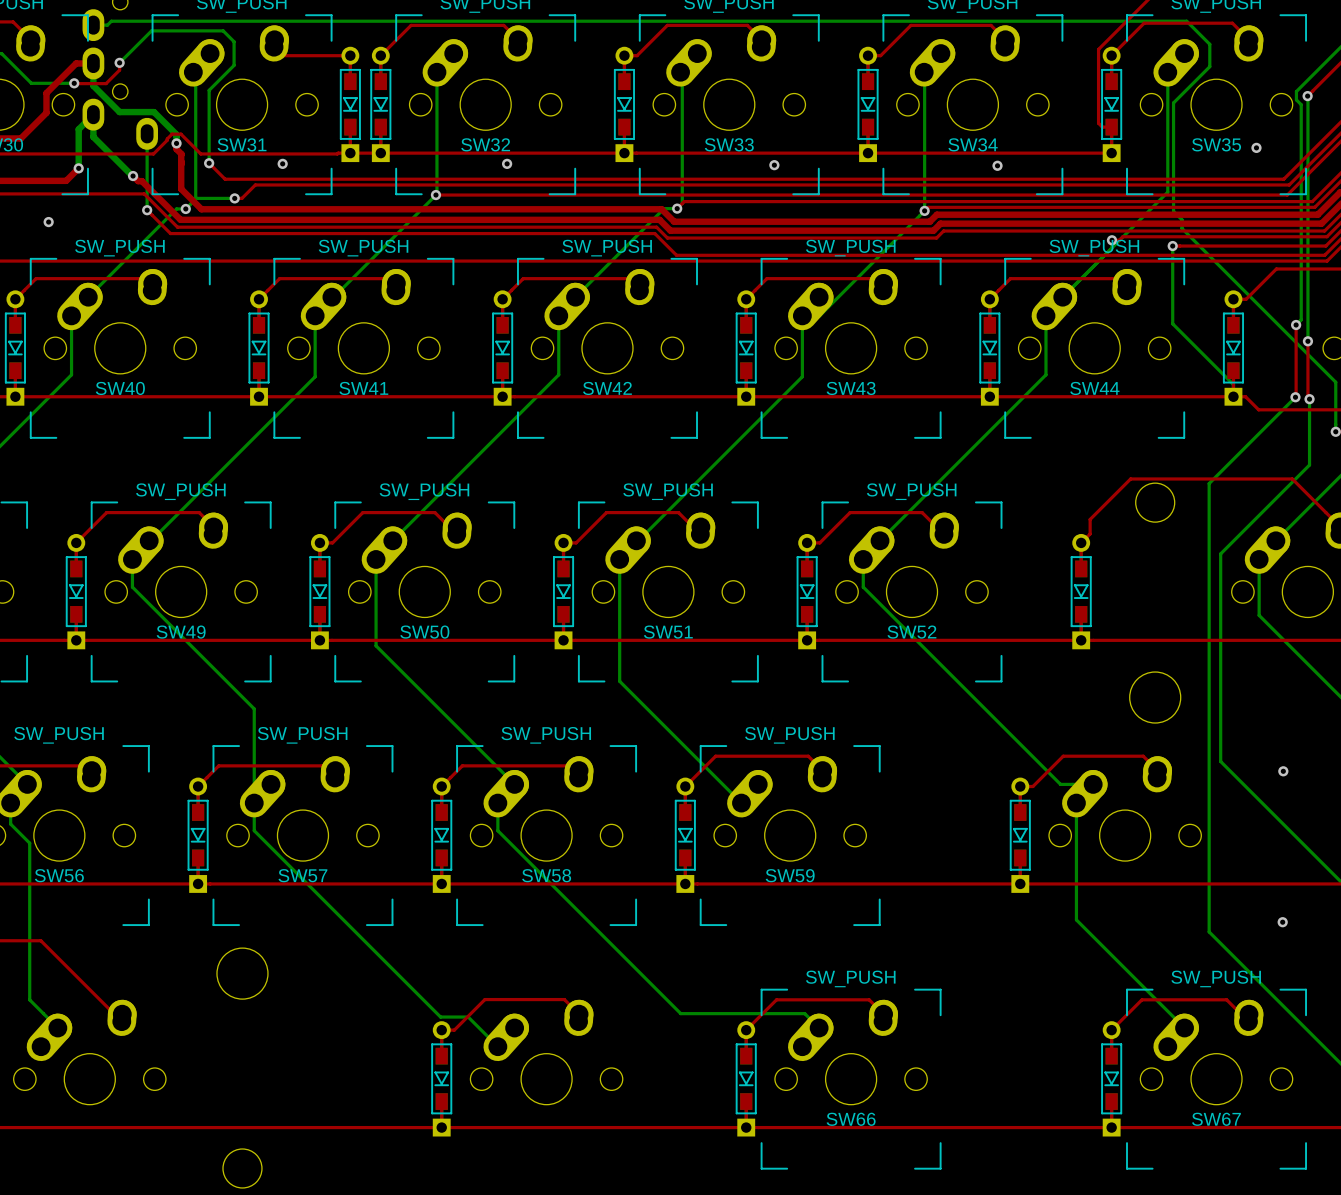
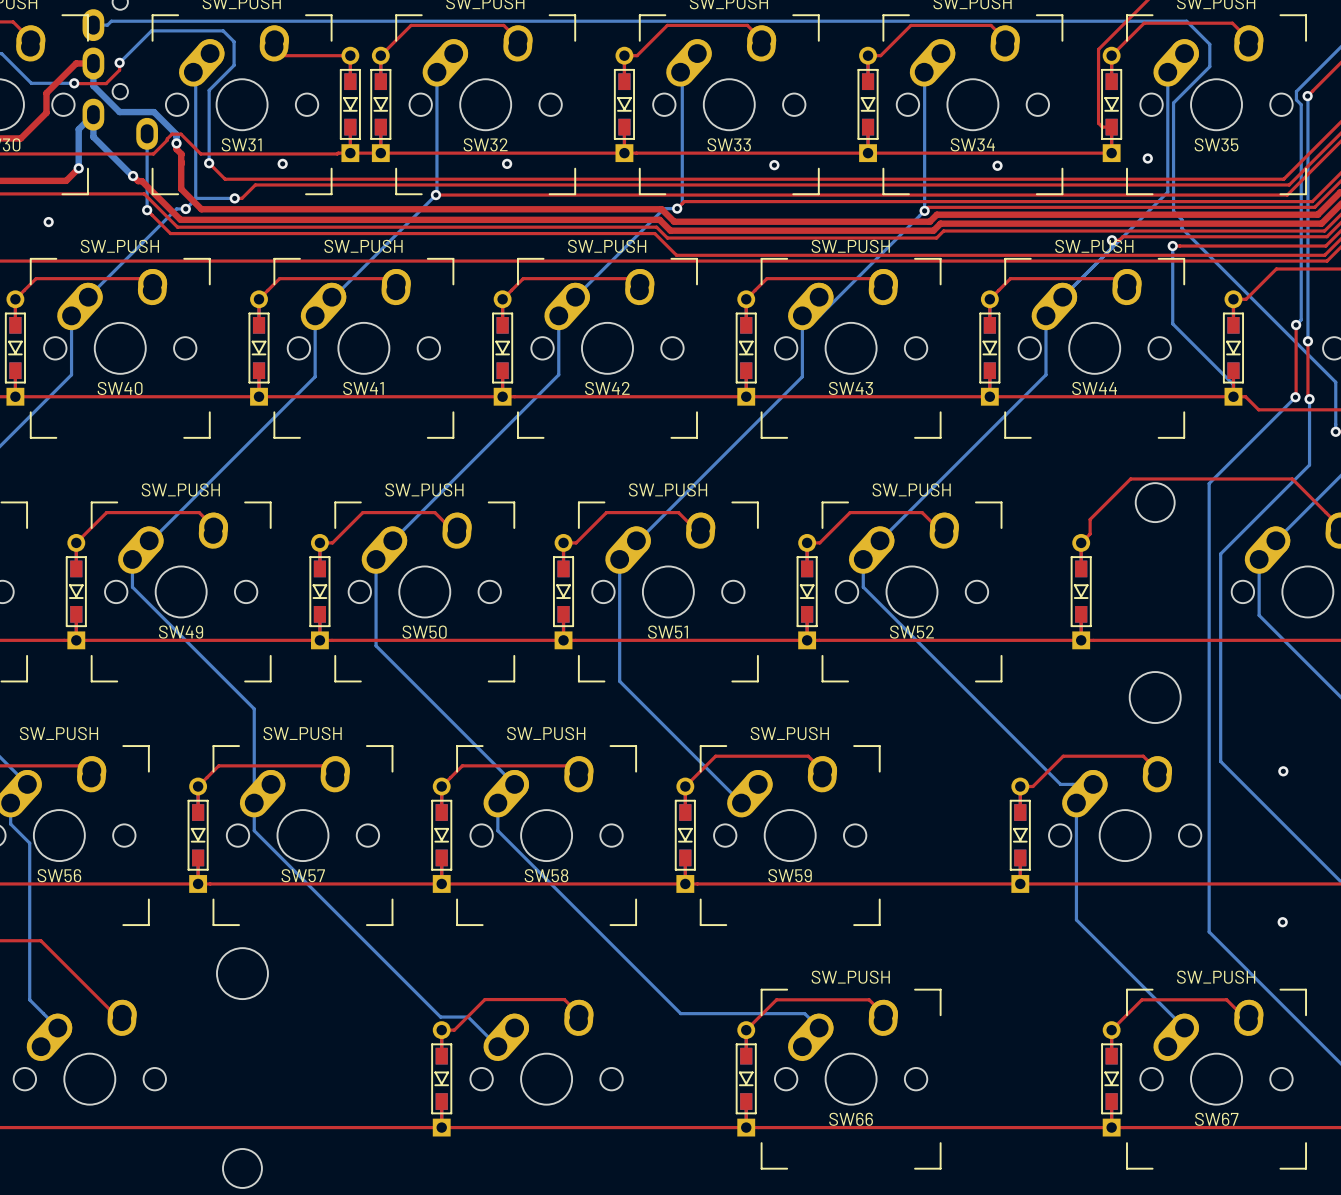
via: (1256, 147) -> none
via: none -> (1147, 158)

